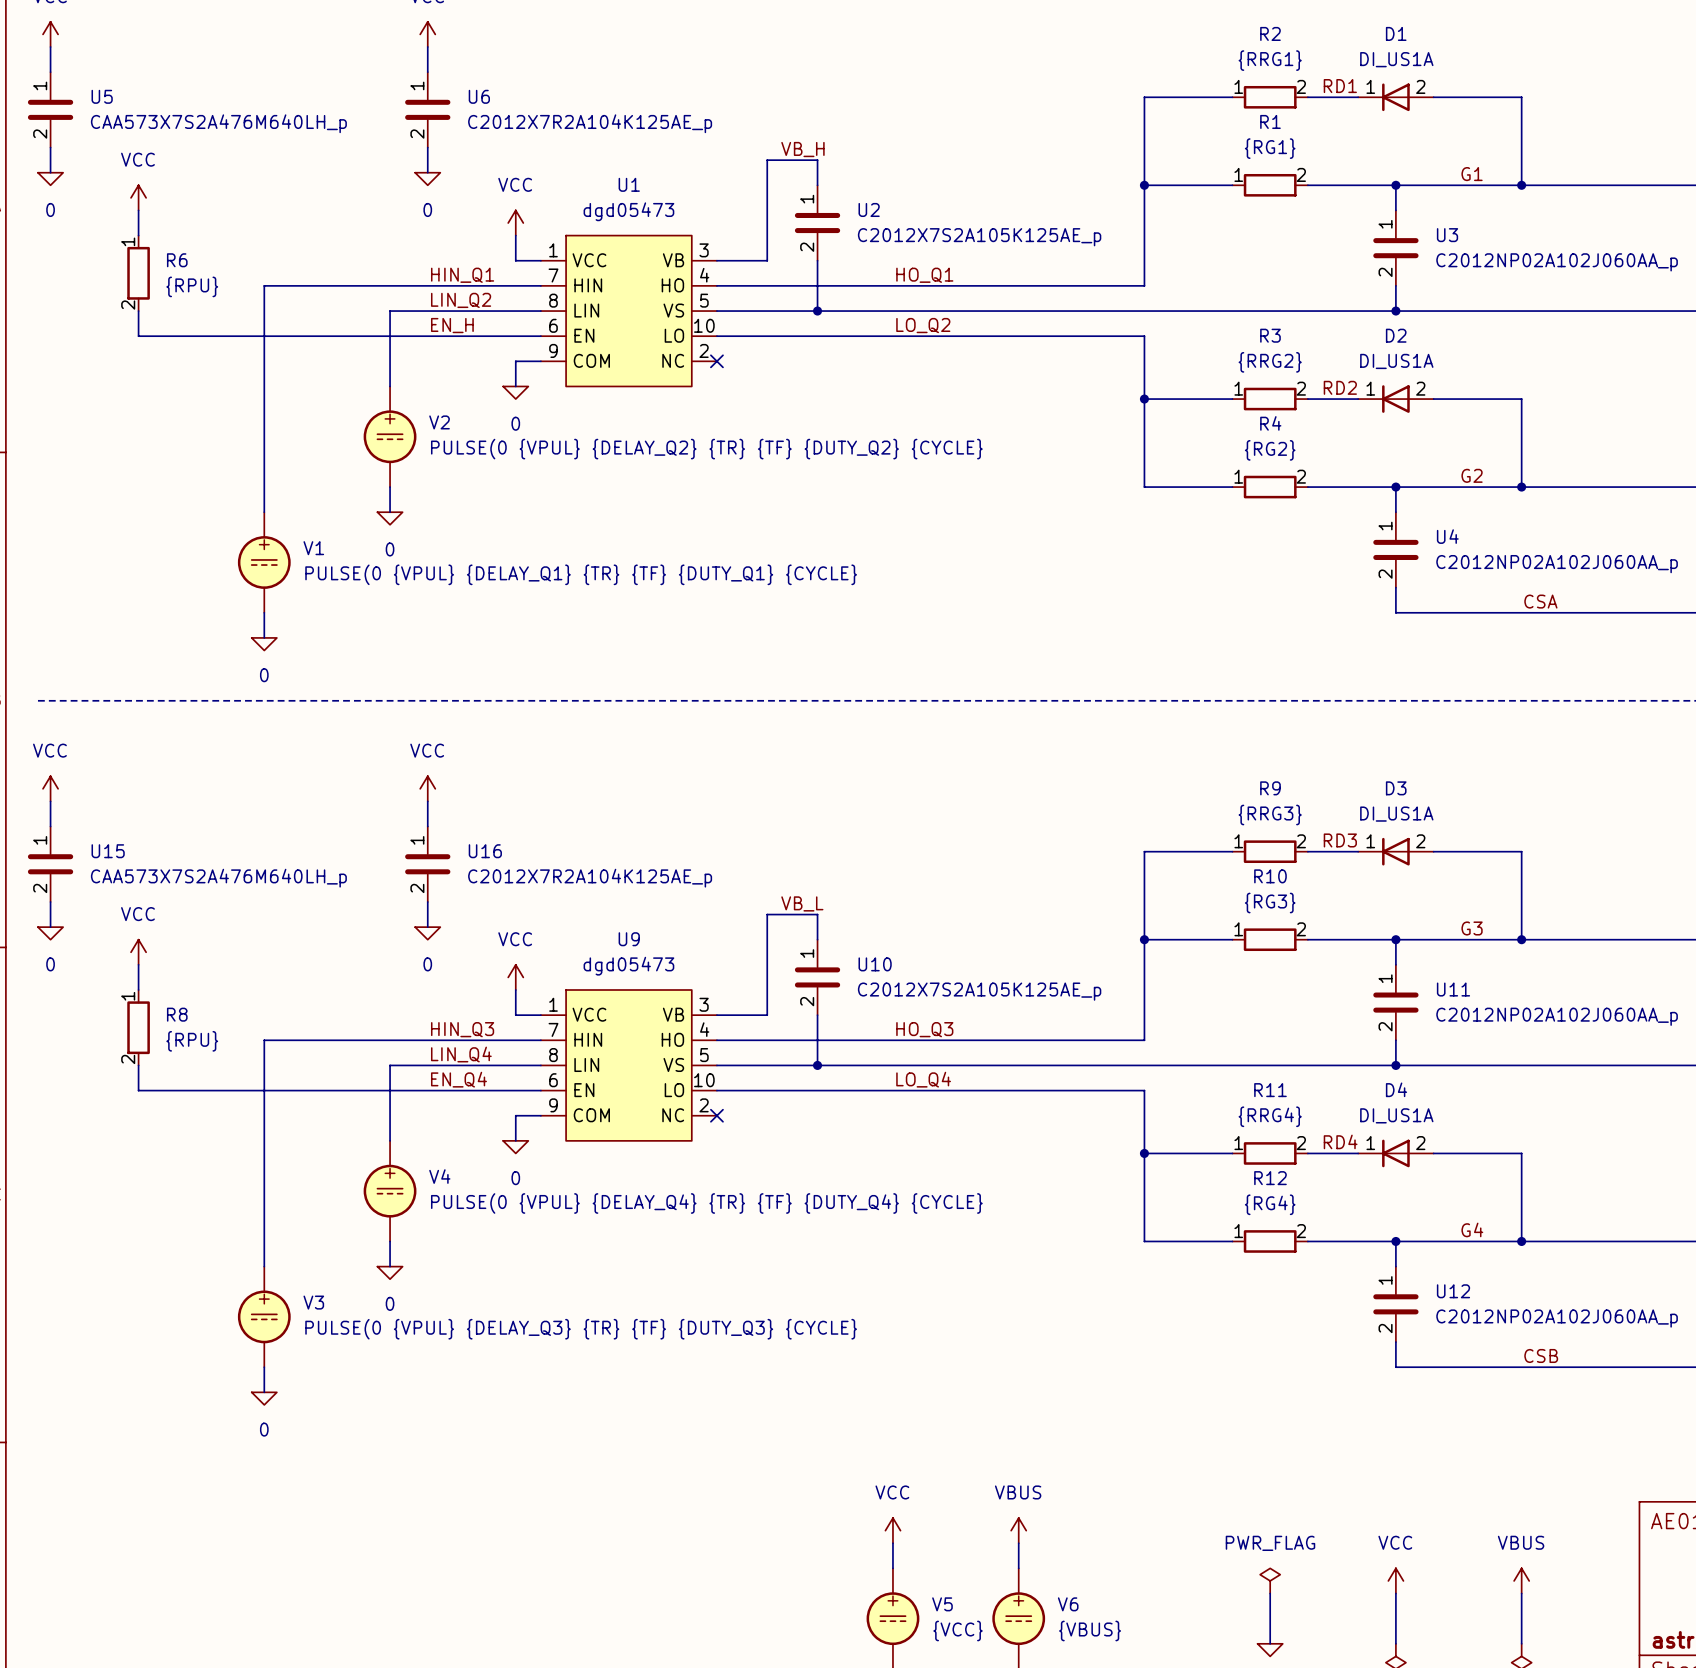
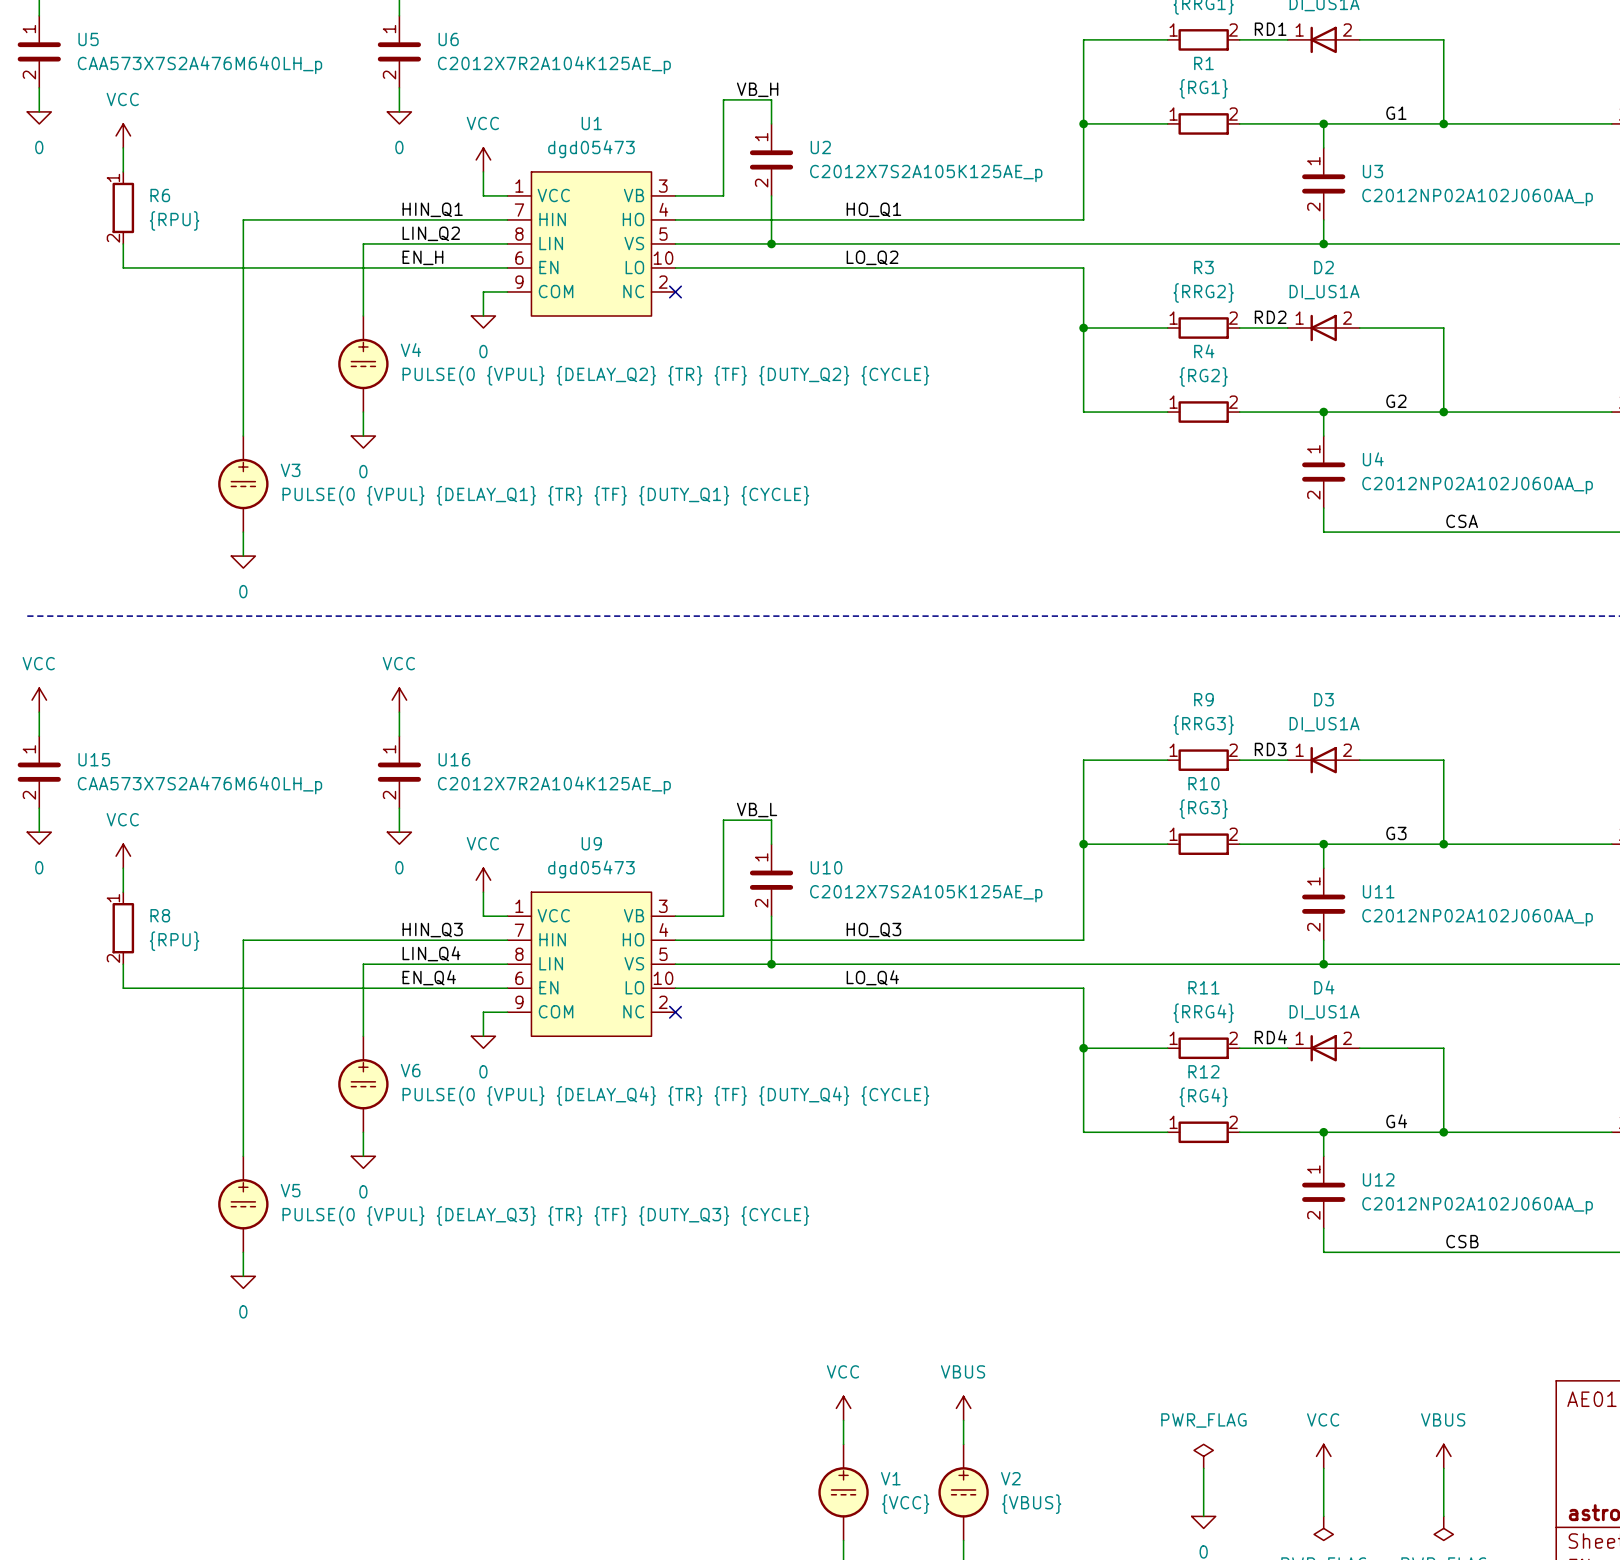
V2 name: V2 (439, 422) -> V4 (410, 350)
V1 name: V1 (313, 548) -> V3 (290, 470)
V4 name: V4 (439, 1176) -> V6 (410, 1070)
V3 name: V3 (313, 1302) -> V5 (290, 1190)
V5 name: V5 (942, 1604) -> V1 (890, 1478)
V6 name: V6 (1068, 1604) -> V2 (1010, 1478)

